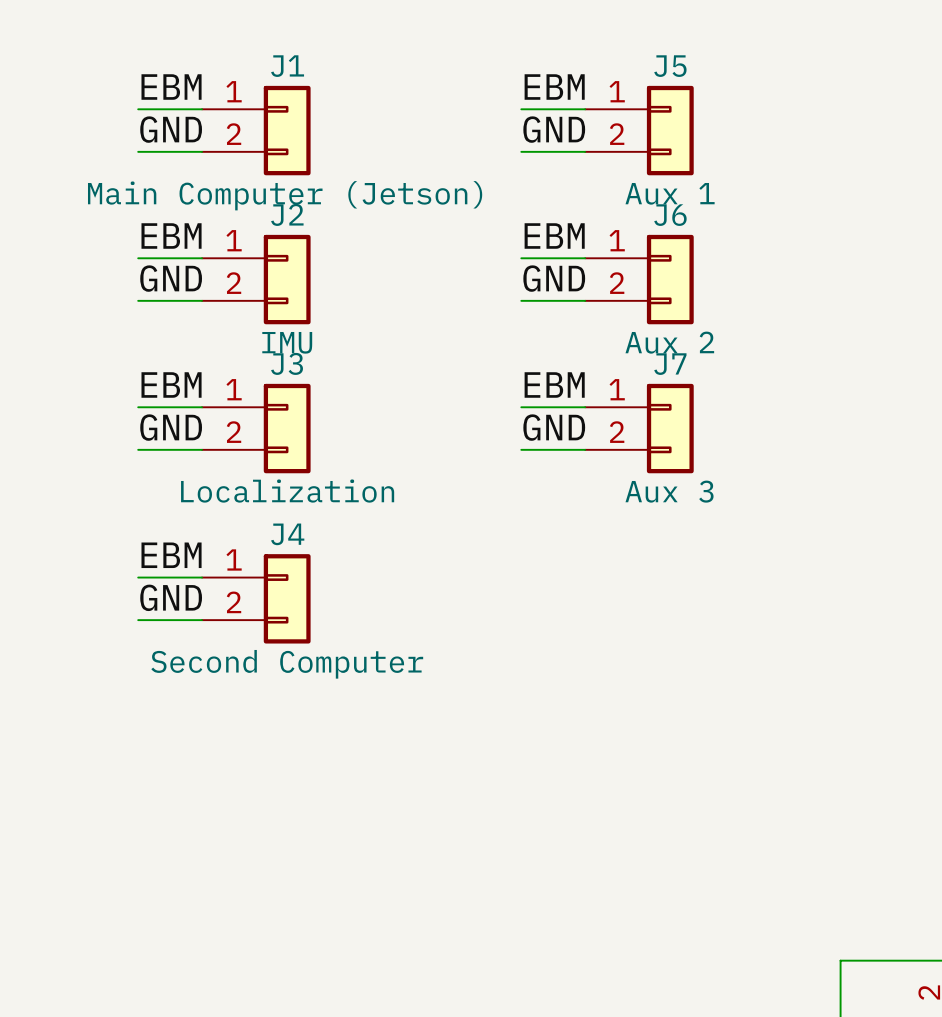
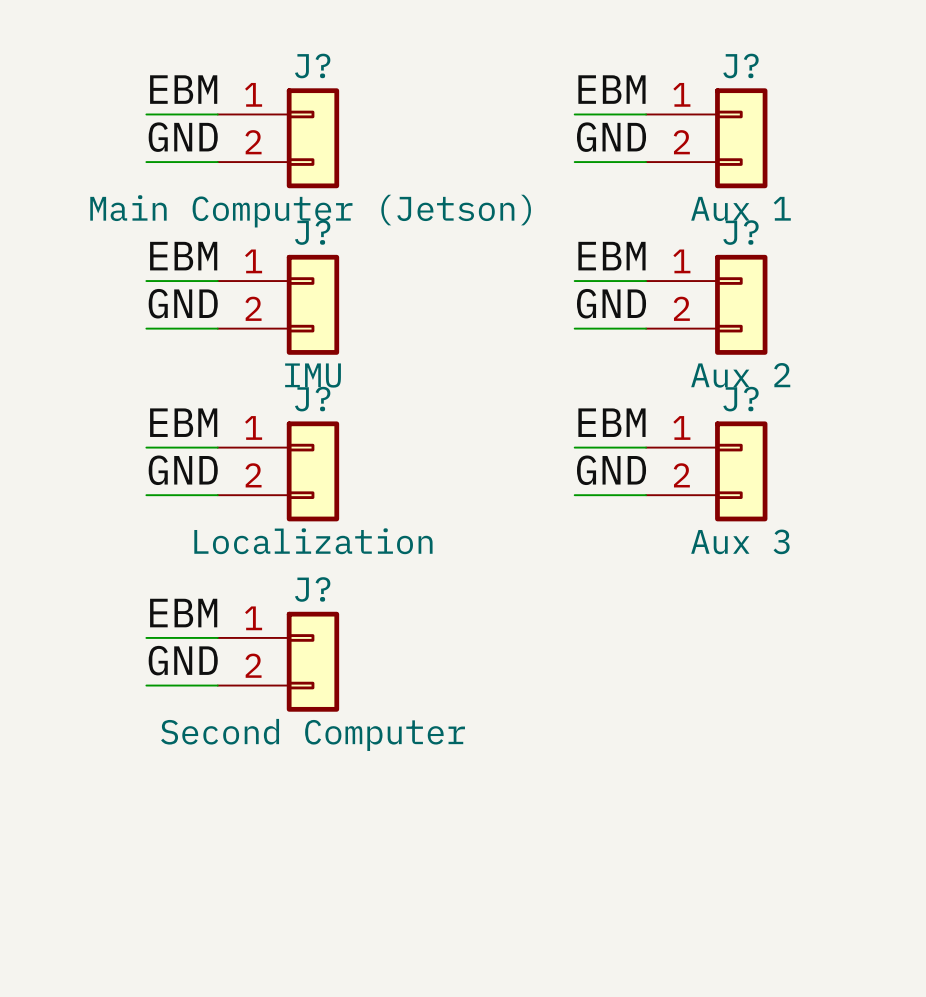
J1 name: J1 (287, 66) -> J? (312, 65)
J5 name: J5 (670, 66) -> J? (740, 65)
J2 name: J2 (287, 214) -> J? (312, 232)
J6 name: J6 (670, 215) -> J? (740, 232)
J3 name: J3 (287, 363) -> J? (312, 399)
J7 name: J7 (670, 364) -> J? (740, 399)
J4 name: J4 (287, 534) -> J? (312, 589)

